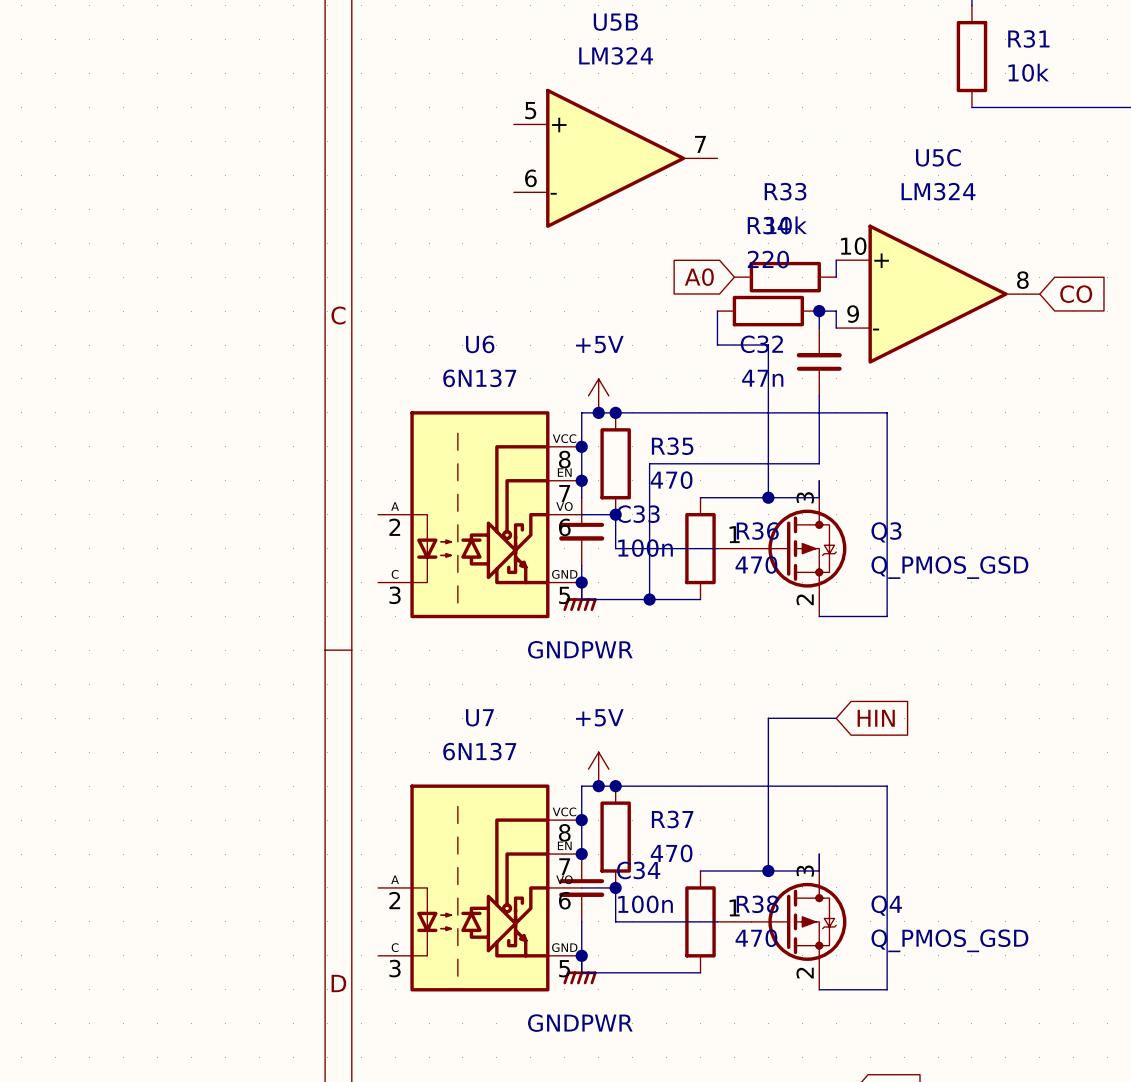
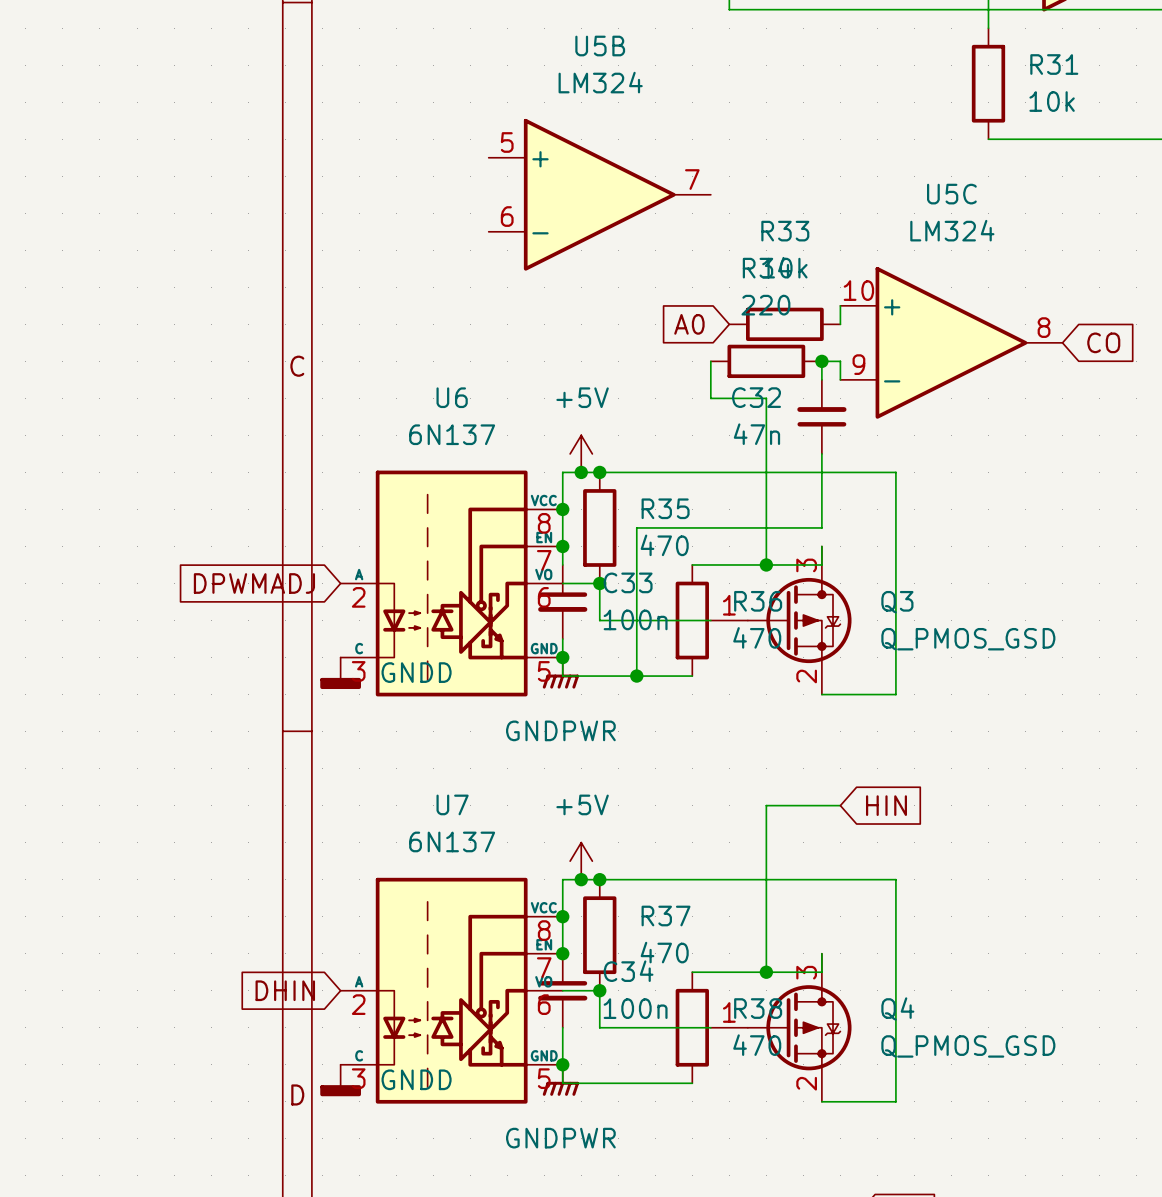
global label: none -> DPWMADJ (254, 583)
power symbol: none -> GNDD (340, 673)
global label: none -> DHIN (285, 990)
power symbol: none -> GNDD (340, 1080)

